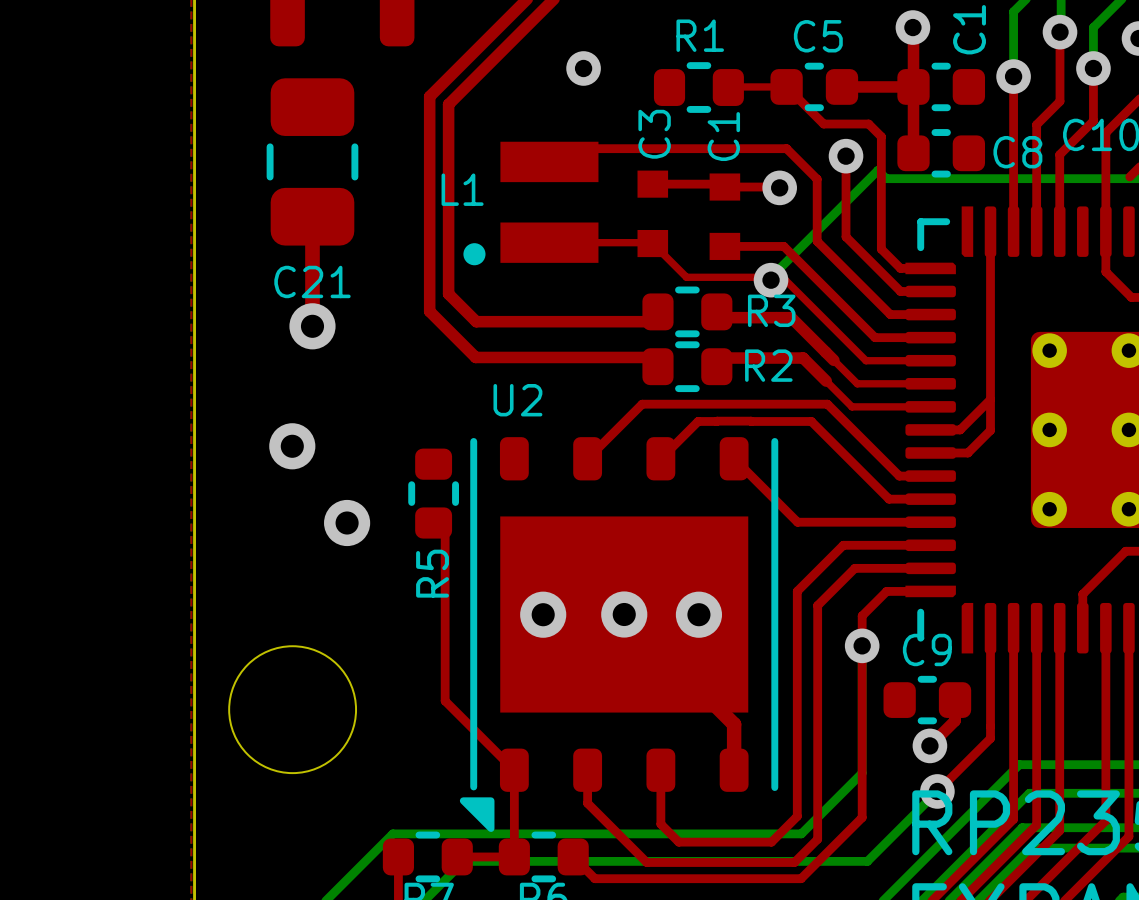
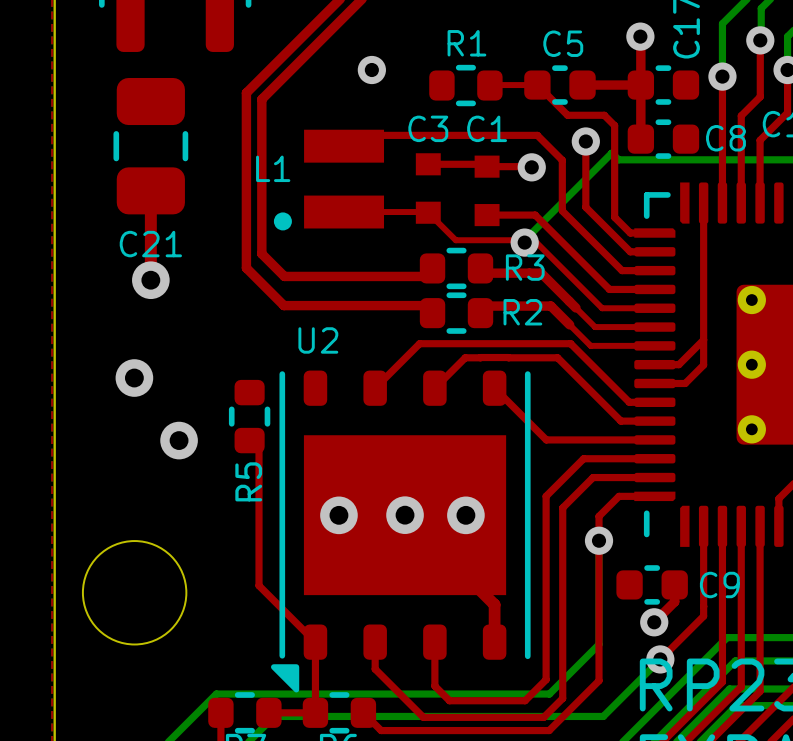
C3 name rotation: 0° (654, 134) -> 90° clockwise (428, 128)
C1 name rotation: 0° (723, 136) -> 90° clockwise (487, 128)
C9 name position: C9 (927, 649) -> C9 (719, 584)

